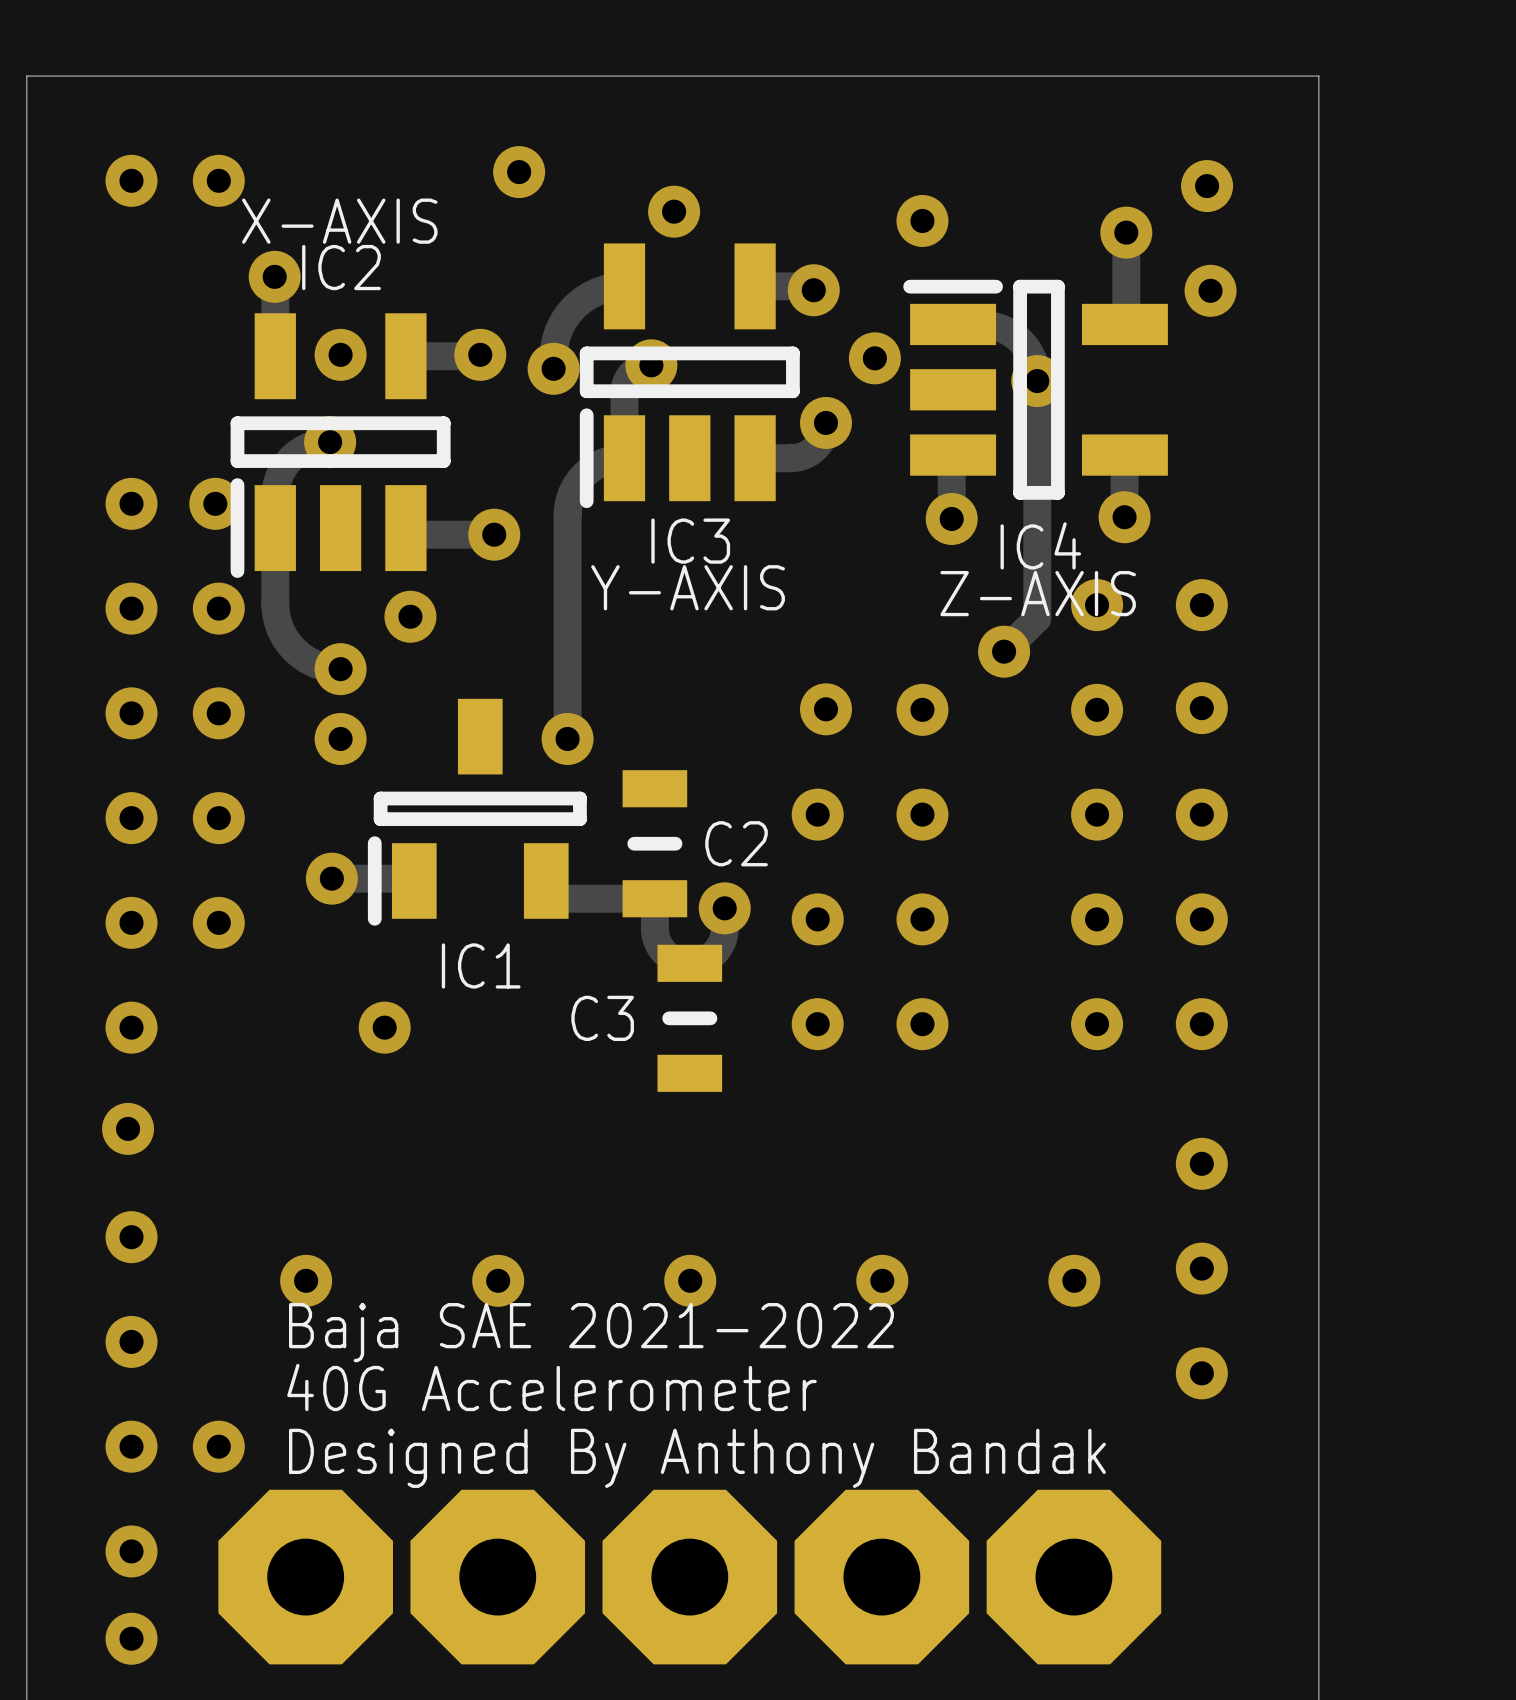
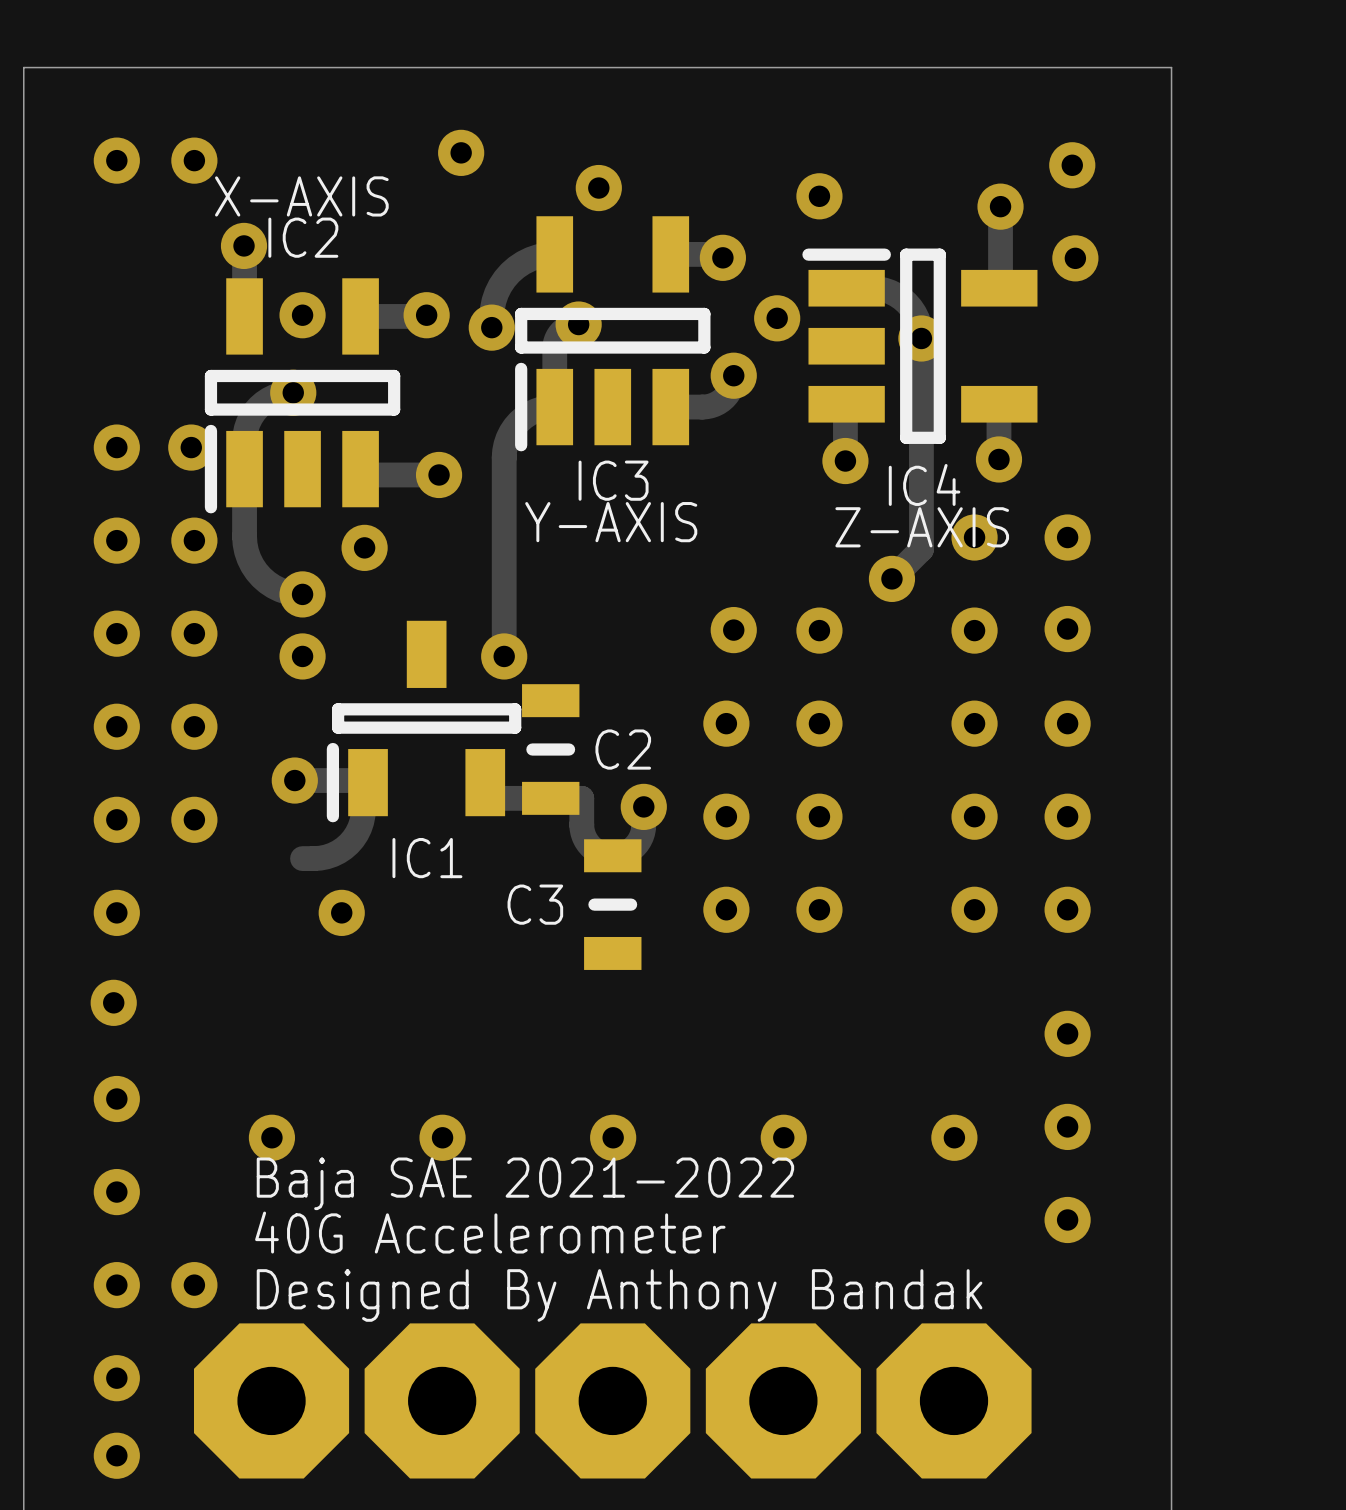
C2 position: (654, 843) -> (550, 749)
track: none -> (363, 808) (361, 821) (356, 833) (344, 848) (326, 856) (302, 858)

